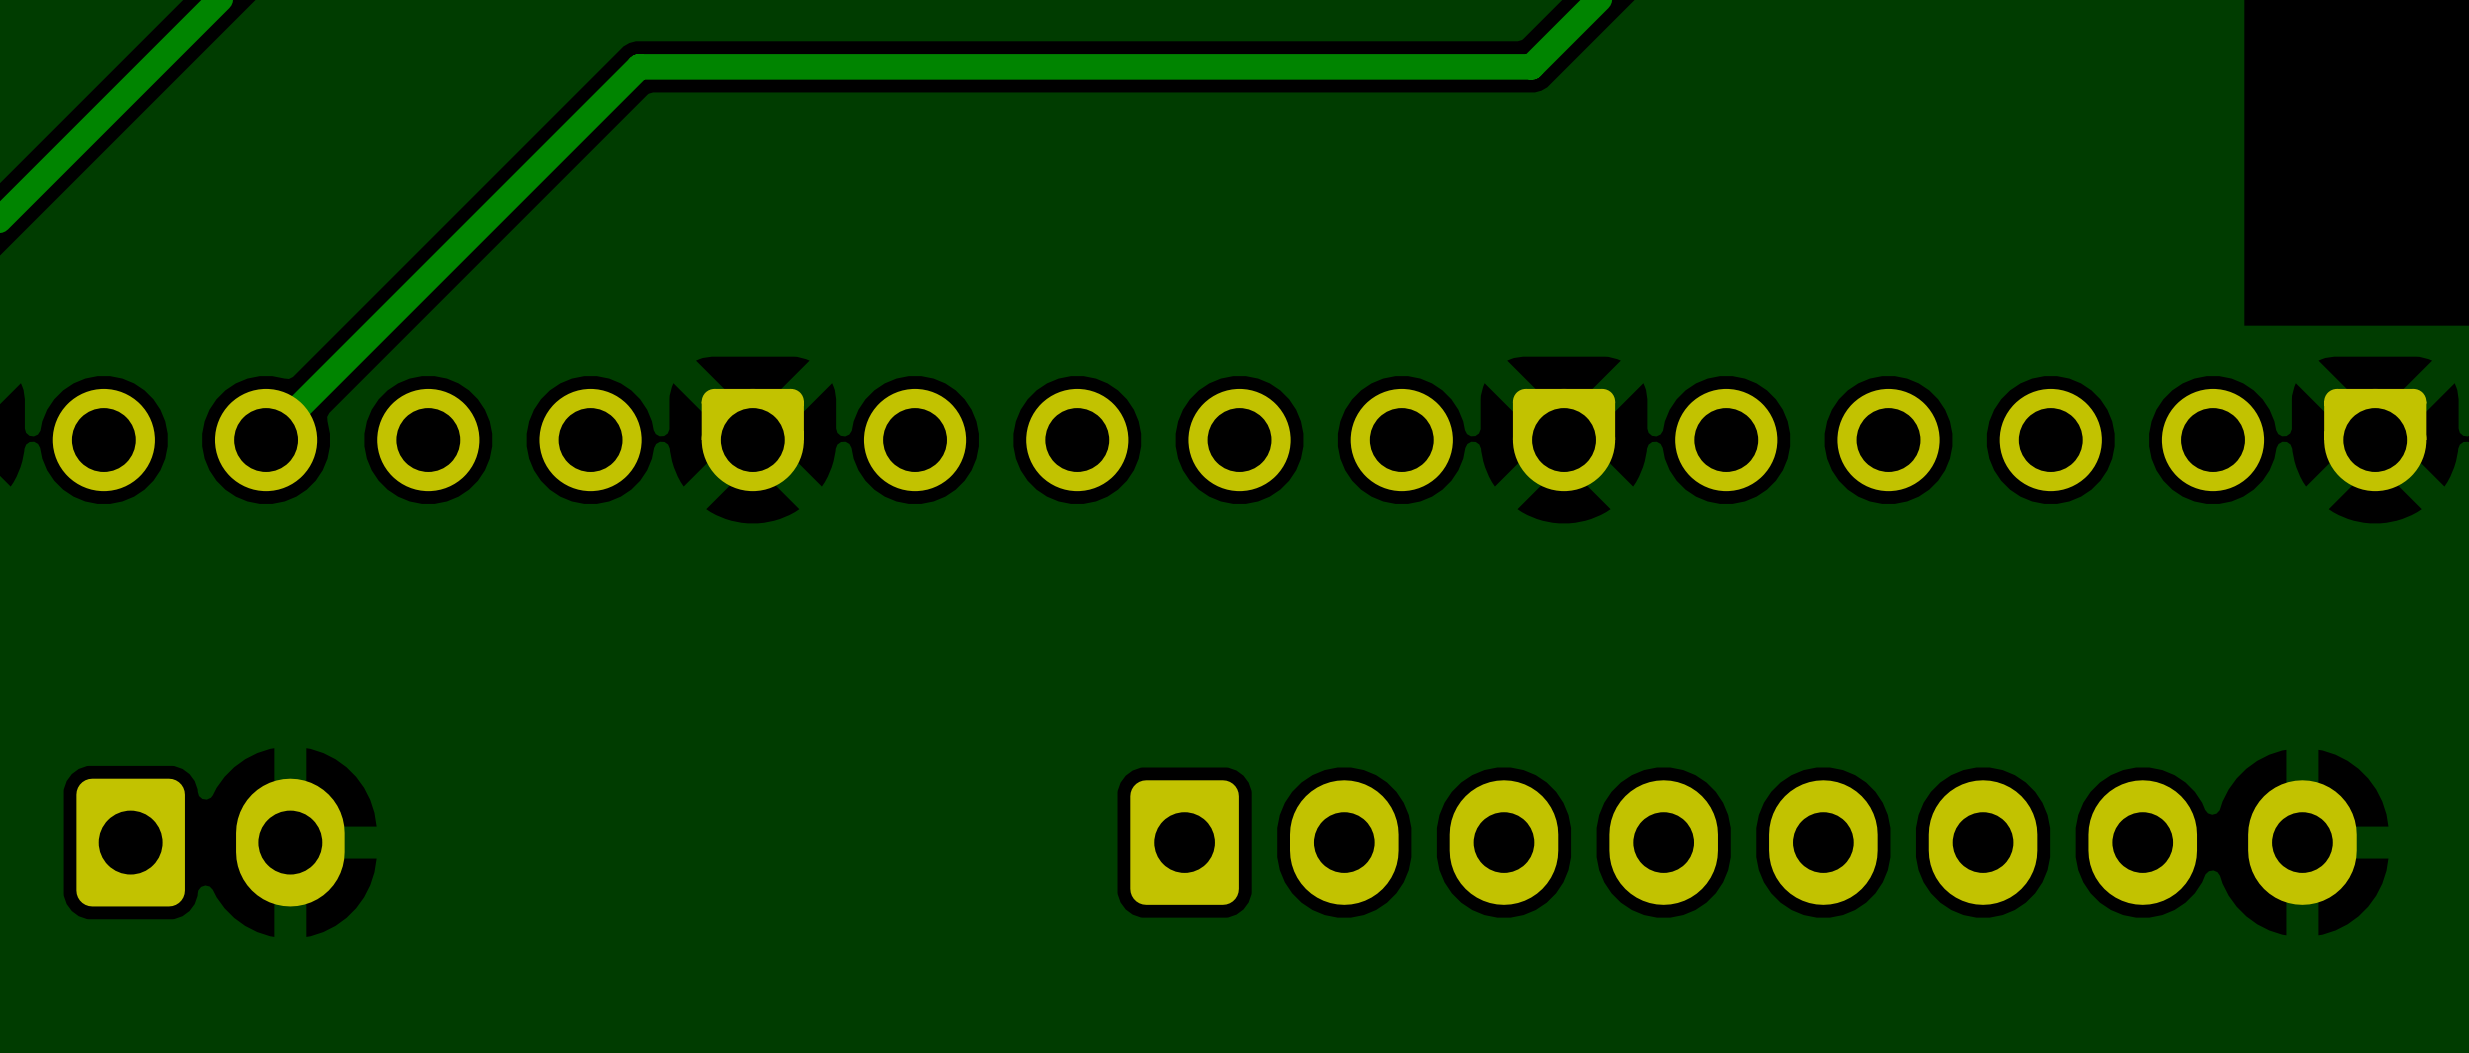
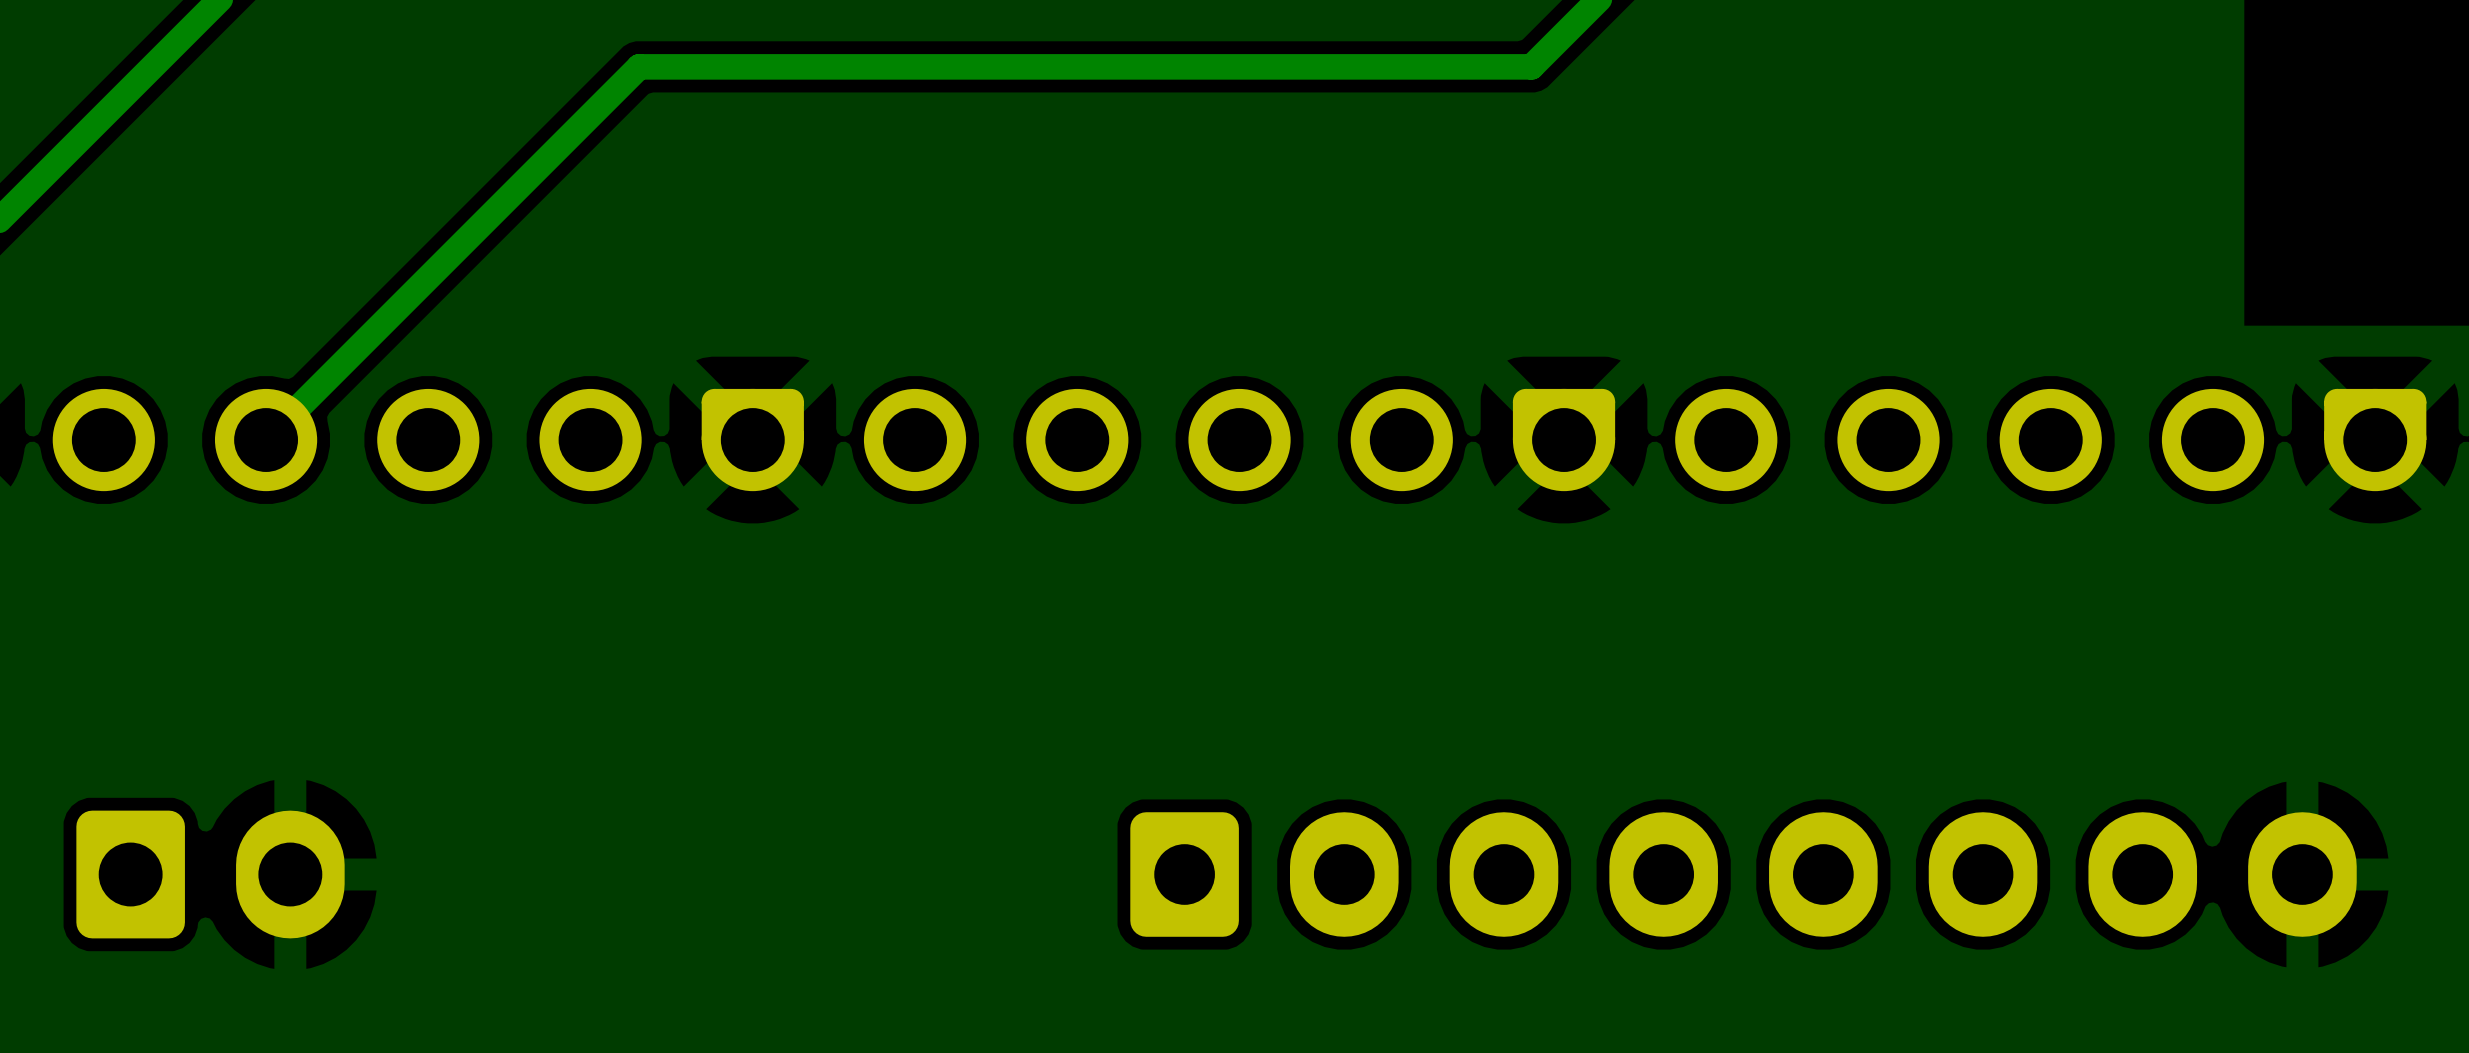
part position: (210, 842) -> (210, 874)
part position: (1743, 842) -> (1743, 874)

